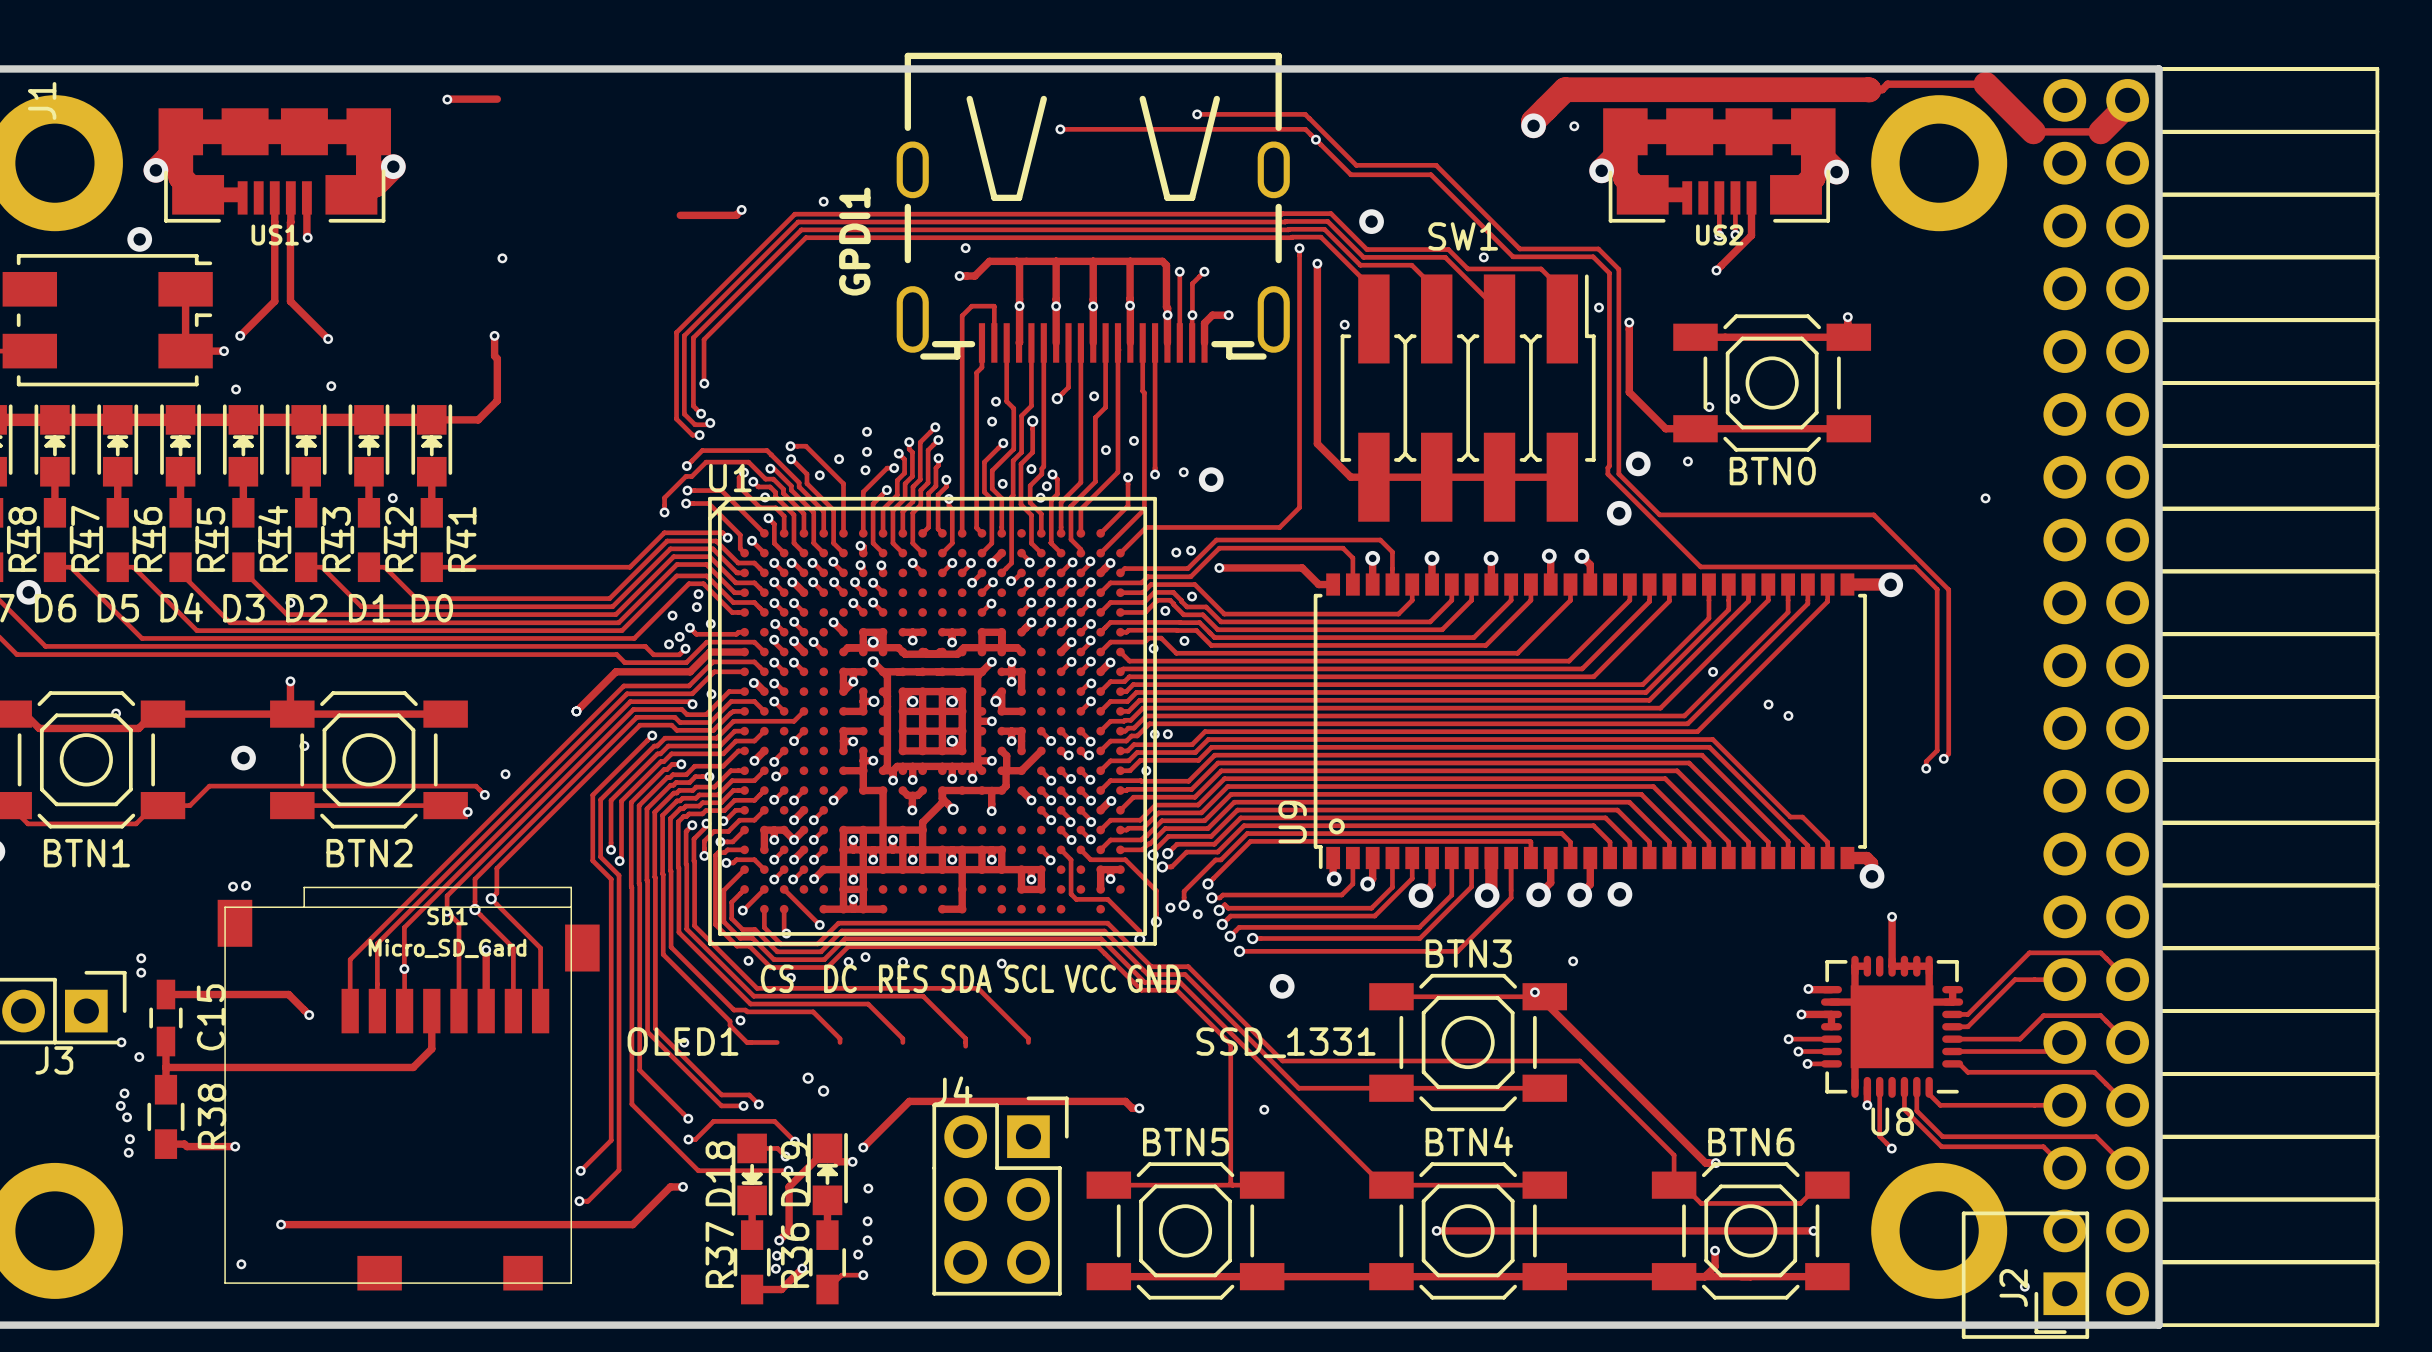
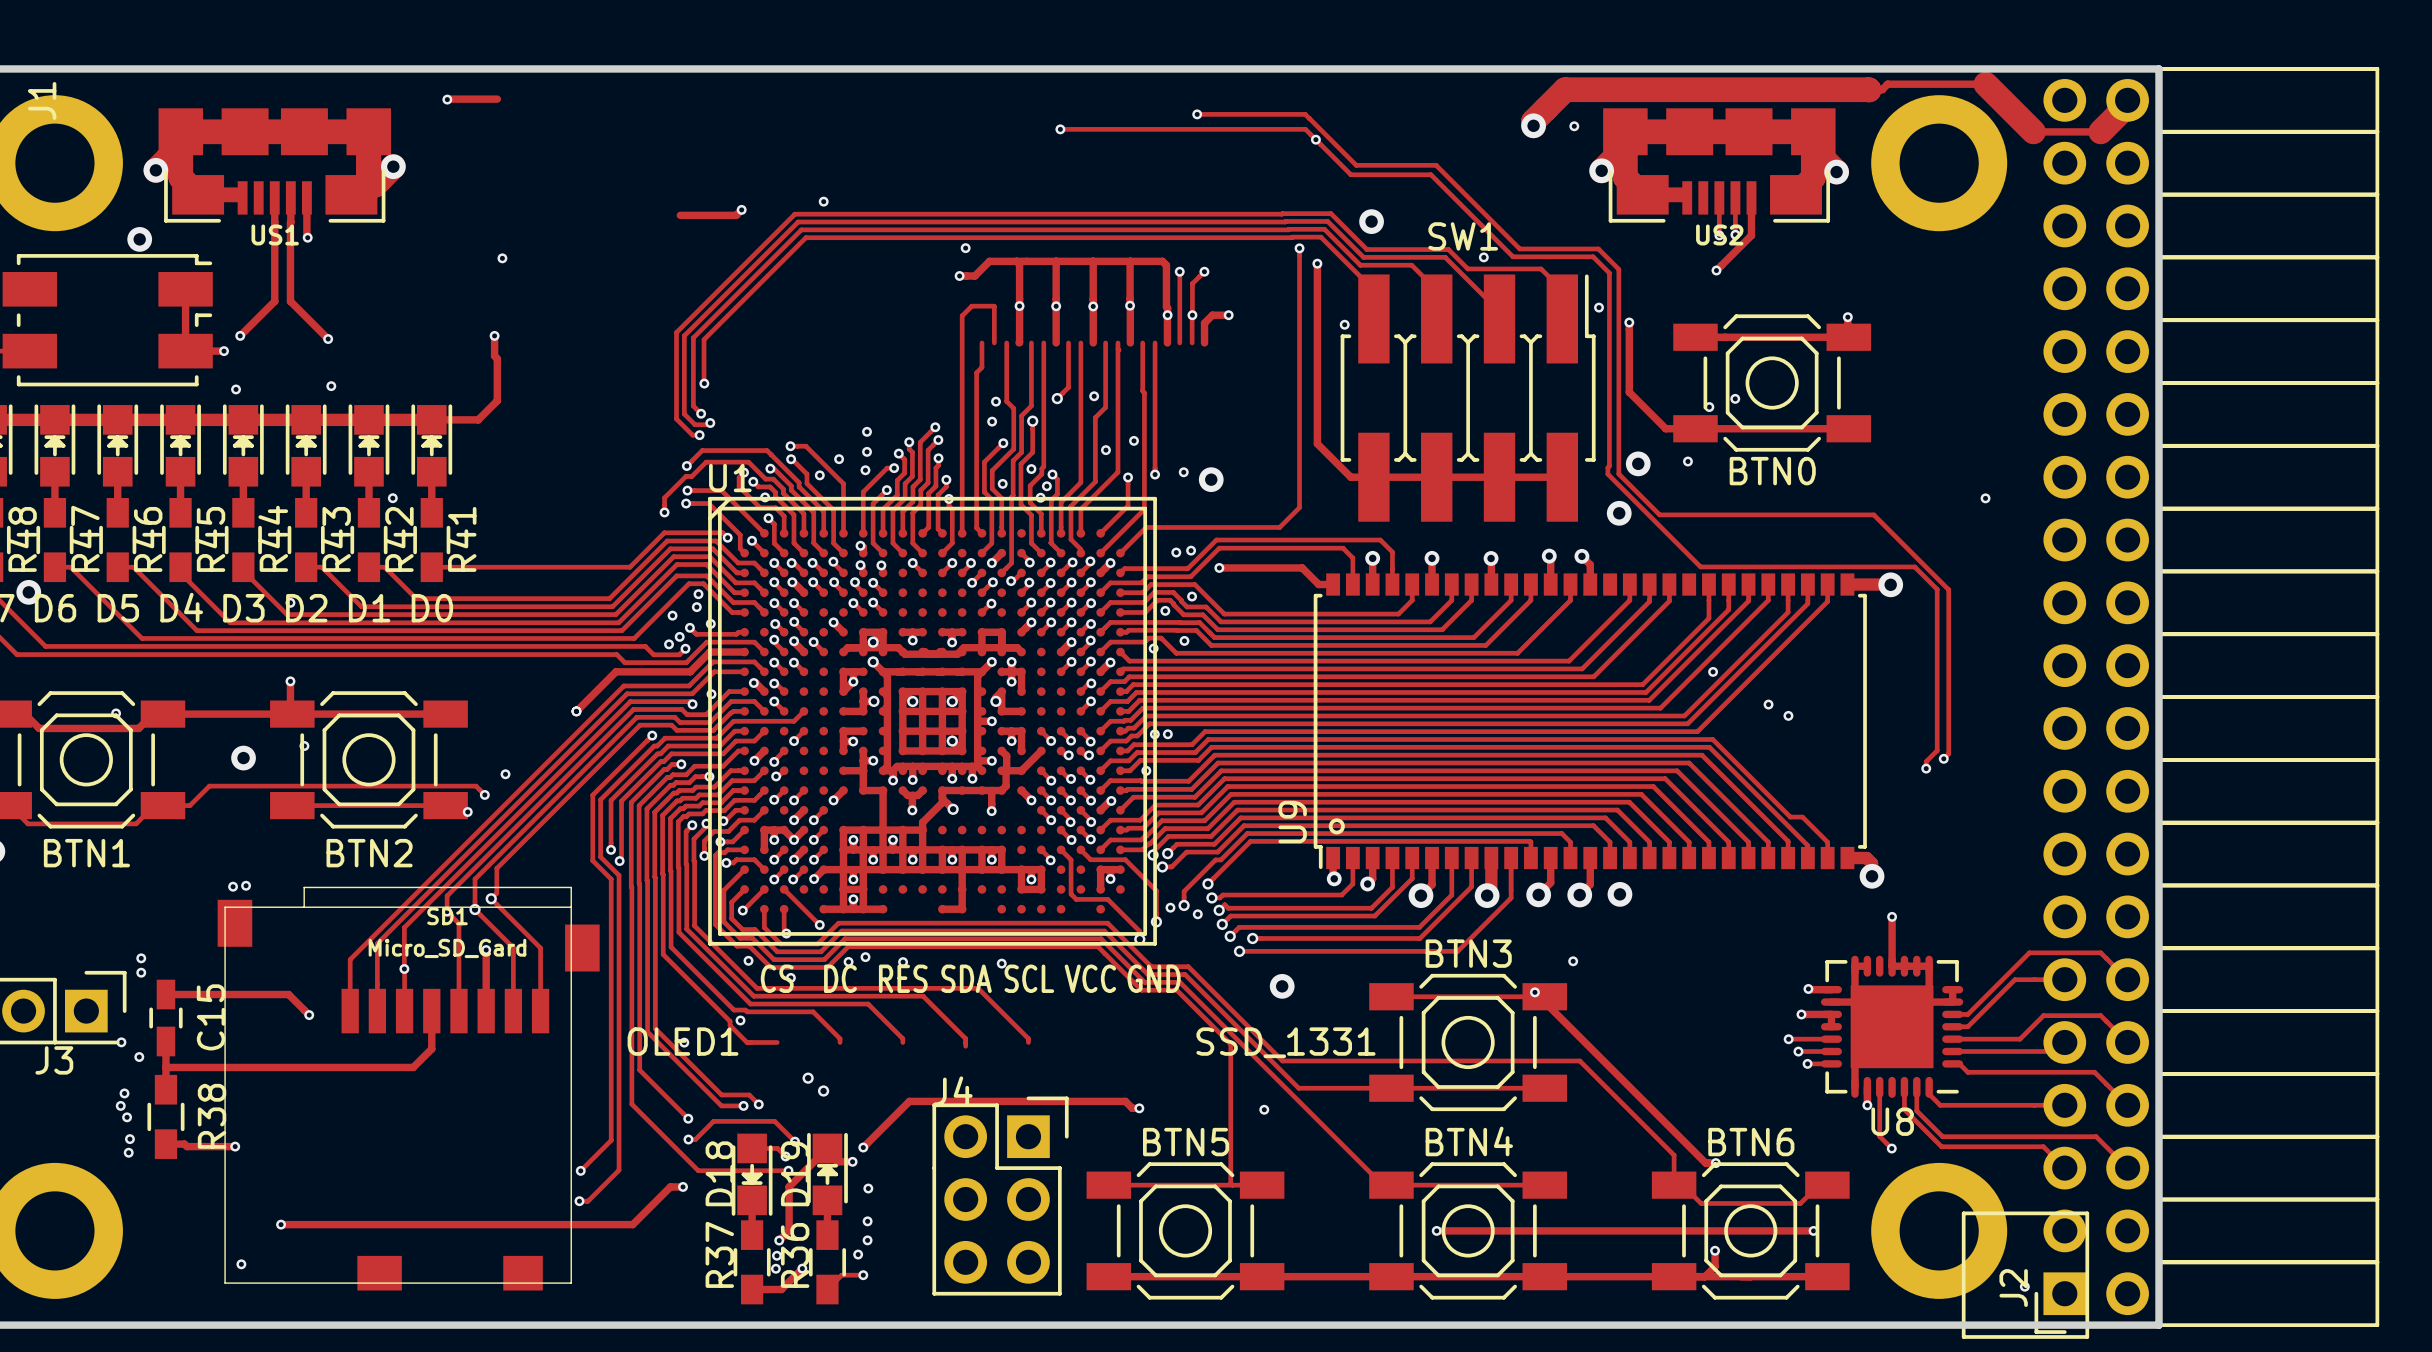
GPDI1: (1093, 207) -> none

